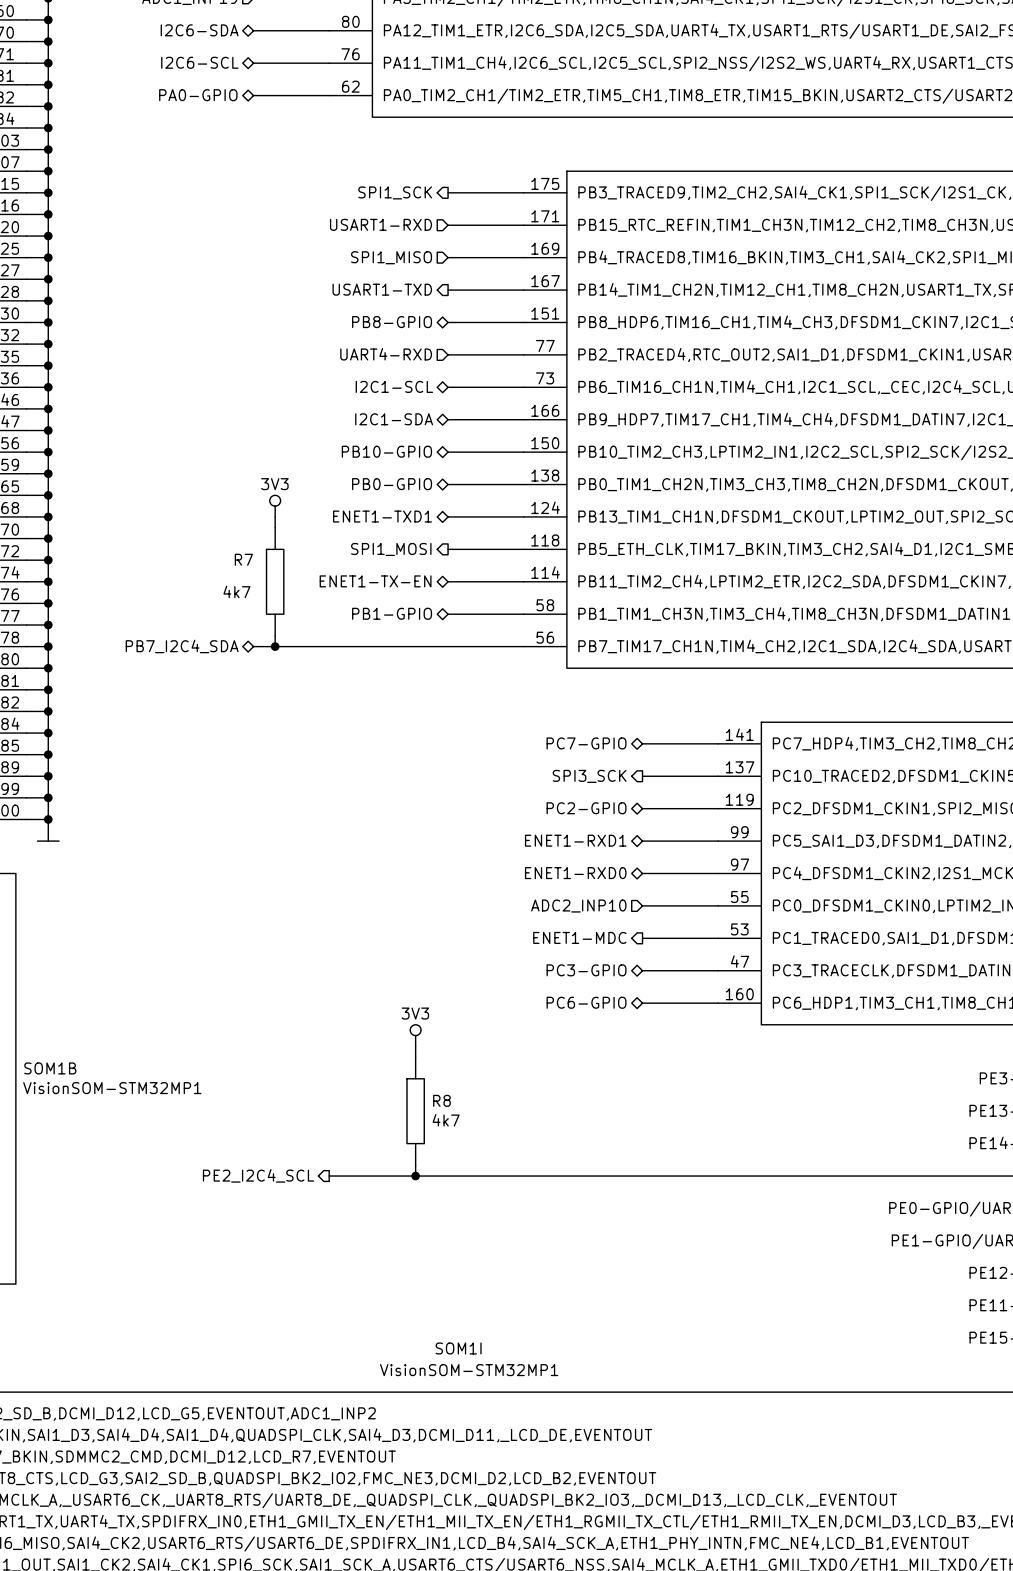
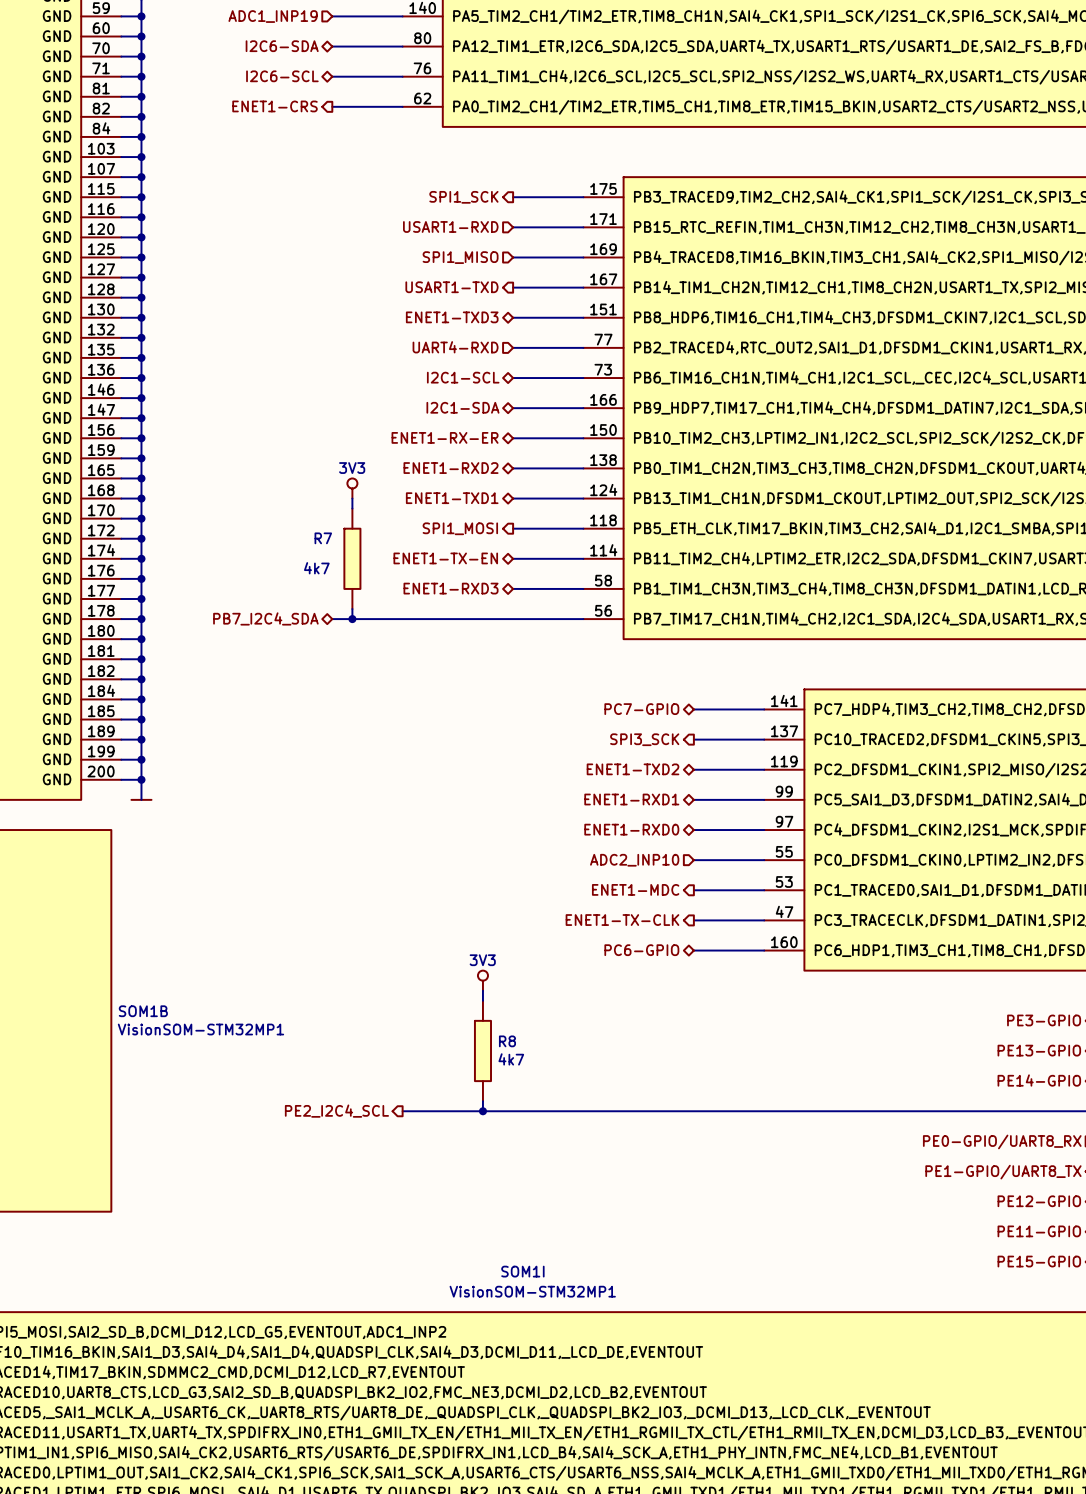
hierarchical label shape: bidirectional (198, 95) -> output (274, 106)
hierarchical label: PA0-GPIO (198, 95) -> ENET1-CRS (274, 106)
hierarchical label: PB8-GPIO (392, 322) -> ENET1-TXD3 (452, 317)
hierarchical label: PB10-GPIO (386, 451) -> ENET1-RX-ER (445, 437)
hierarchical label: PB0-GPIO (392, 484) -> ENET1-RXD2 (451, 468)
hierarchical label: PB1-GPIO (392, 613) -> ENET1-RXD3 (451, 588)
hierarchical label: PC2-GPIO (586, 808) -> ENET1-TXD2 (633, 769)
hierarchical label shape: bidirectional (586, 970) -> output (622, 920)
hierarchical label: PC3-GPIO (586, 970) -> ENET1-TX-CLK (622, 920)

